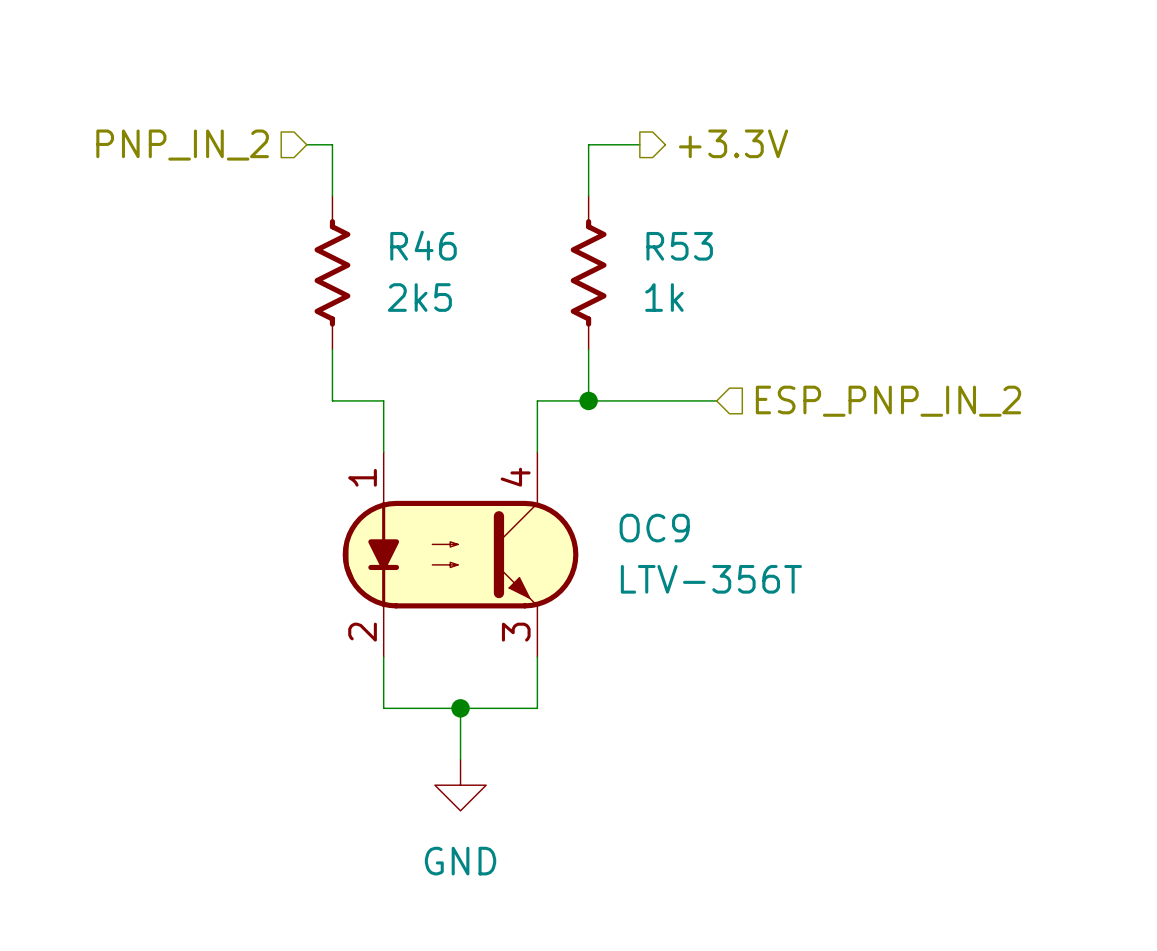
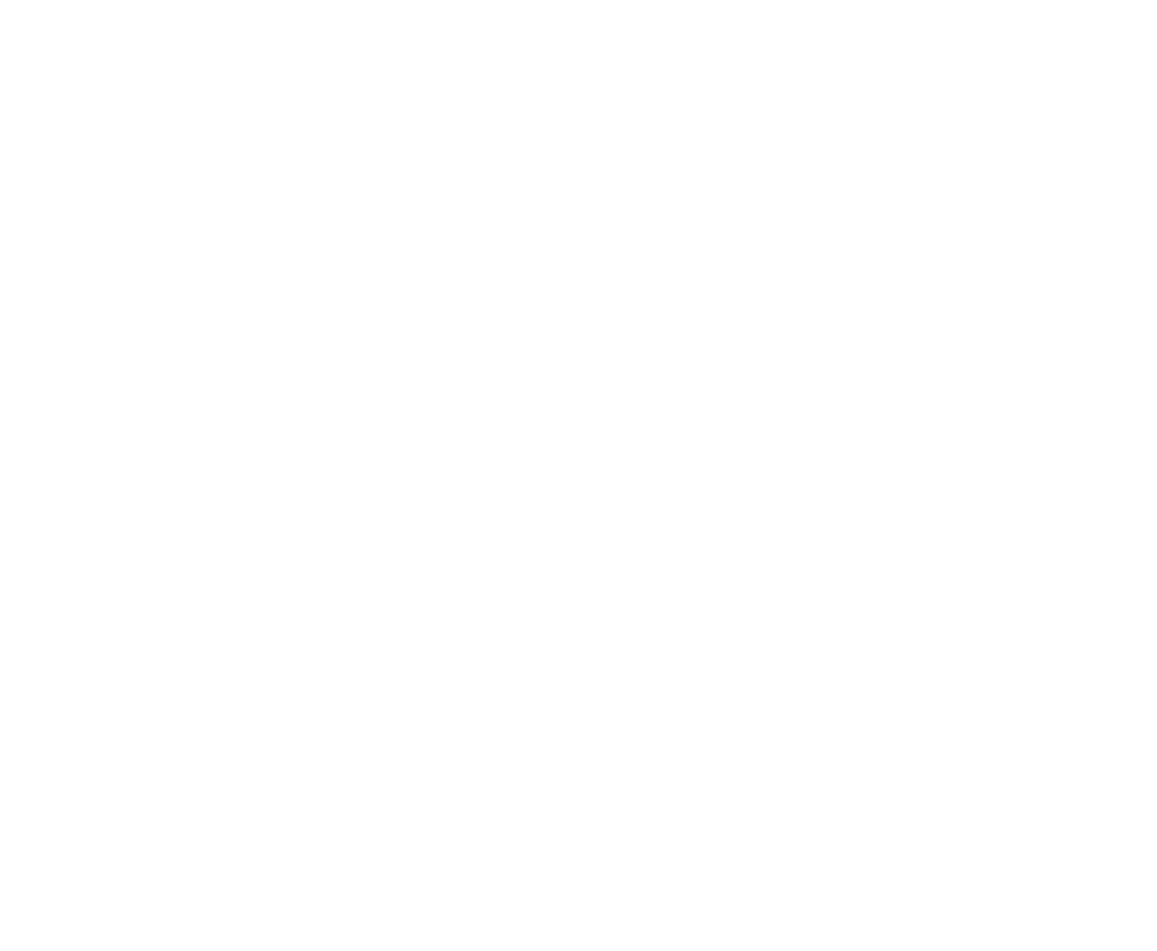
hierarchical label: +3.3V (733, 143) -> none
wire: (306, 144) (332, 144) (332, 196) -> none
wire: (639, 144) (588, 144) (588, 196) -> none
hierarchical label: PNP_IN_2 (182, 145) -> none
R46: 2k5 (332, 272) -> none
R53: 1k (588, 272) -> none
wire: (332, 349) (332, 400) (383, 400) (383, 452) -> none
wire: (588, 349) (588, 400) -> none
junction: (588, 400) -> none
wire: (716, 400) (537, 400) (537, 452) -> none
hierarchical label: ESP_PNP_IN_2 (888, 401) -> none
OC9: LTV-356T (460, 554) -> none
wire: (383, 657) (383, 708) (537, 708) (537, 657) -> none
wire: (460, 708) (460, 759) -> none
junction: (460, 708) -> none
power symbol: GND (460, 785) -> none

